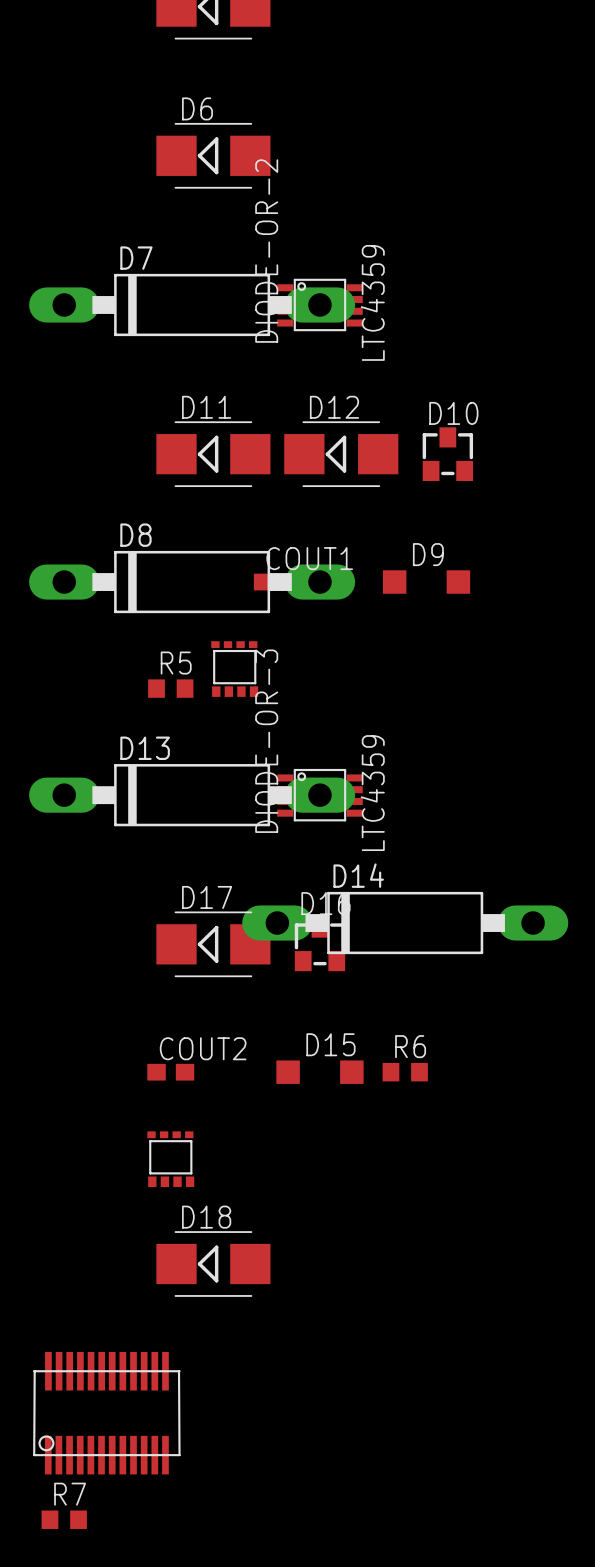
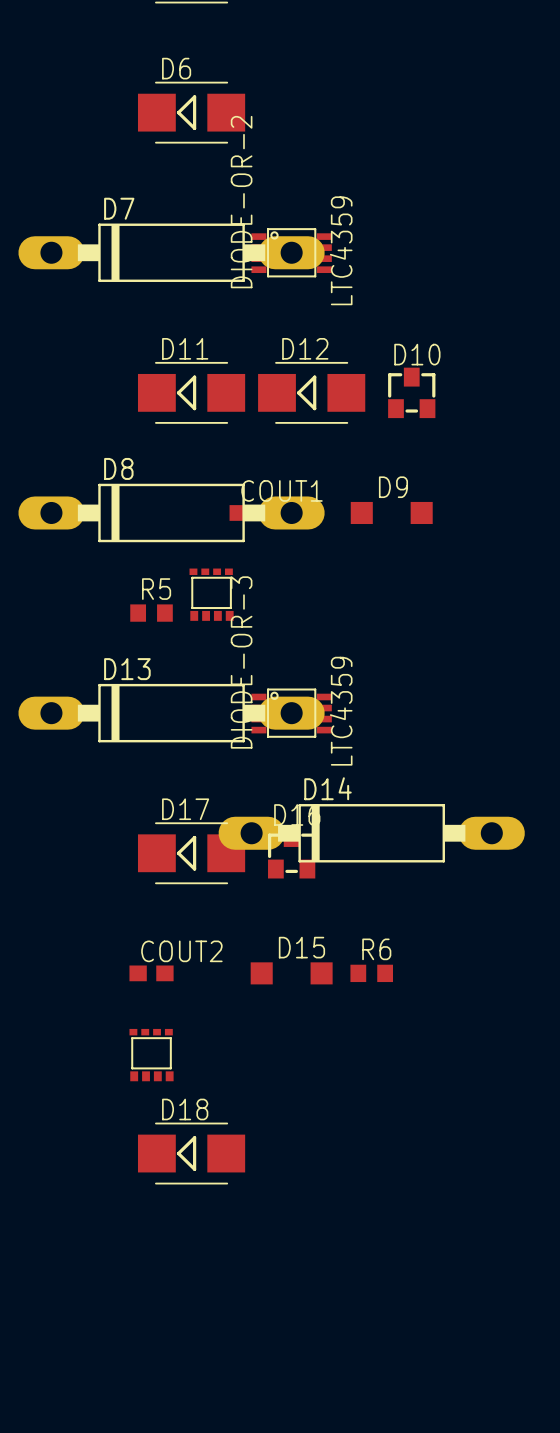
part: (106, 1413) -> none
R7: (64, 1519) -> none

